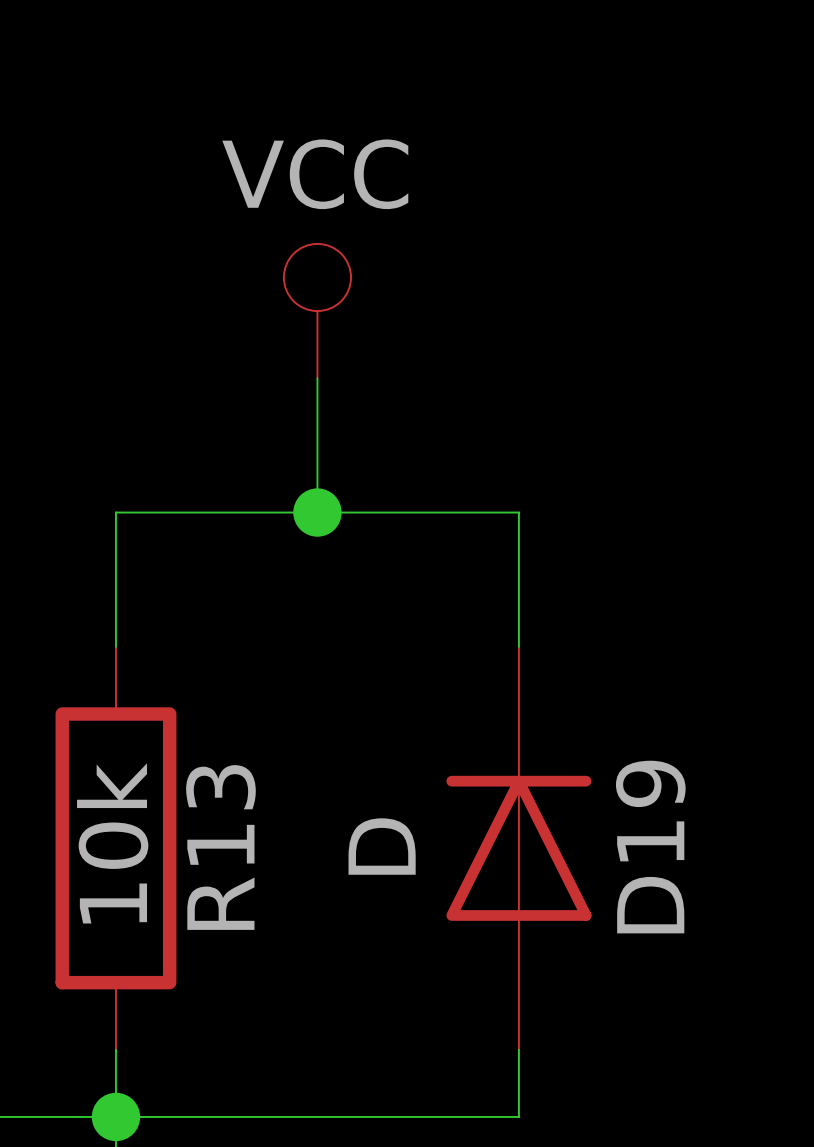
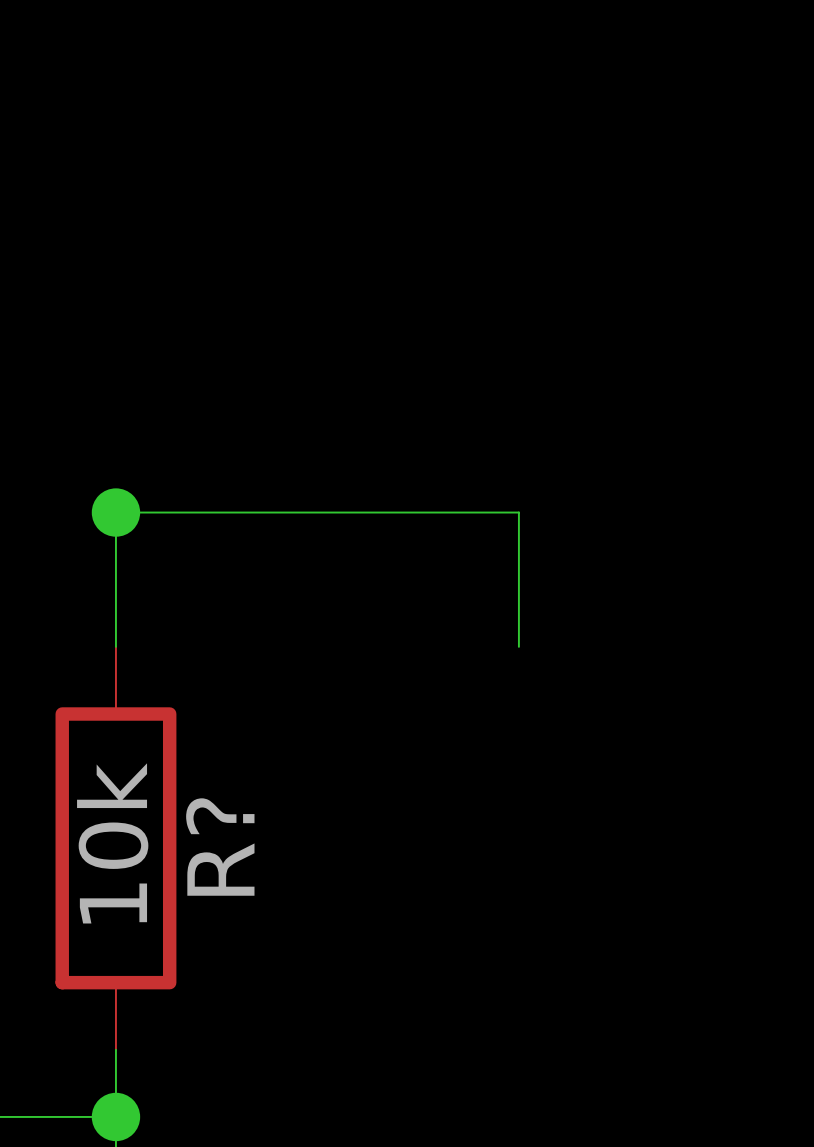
power symbol: VCC (317, 311) -> none
wire: (317, 378) (317, 512) -> none
junction position: (317, 512) -> (115, 512)
R13 name: R13 (220, 847) -> R? (220, 847)
D19: D (518, 848) -> none
wire: (518, 1049) (518, 1116) (115, 1116) -> none

